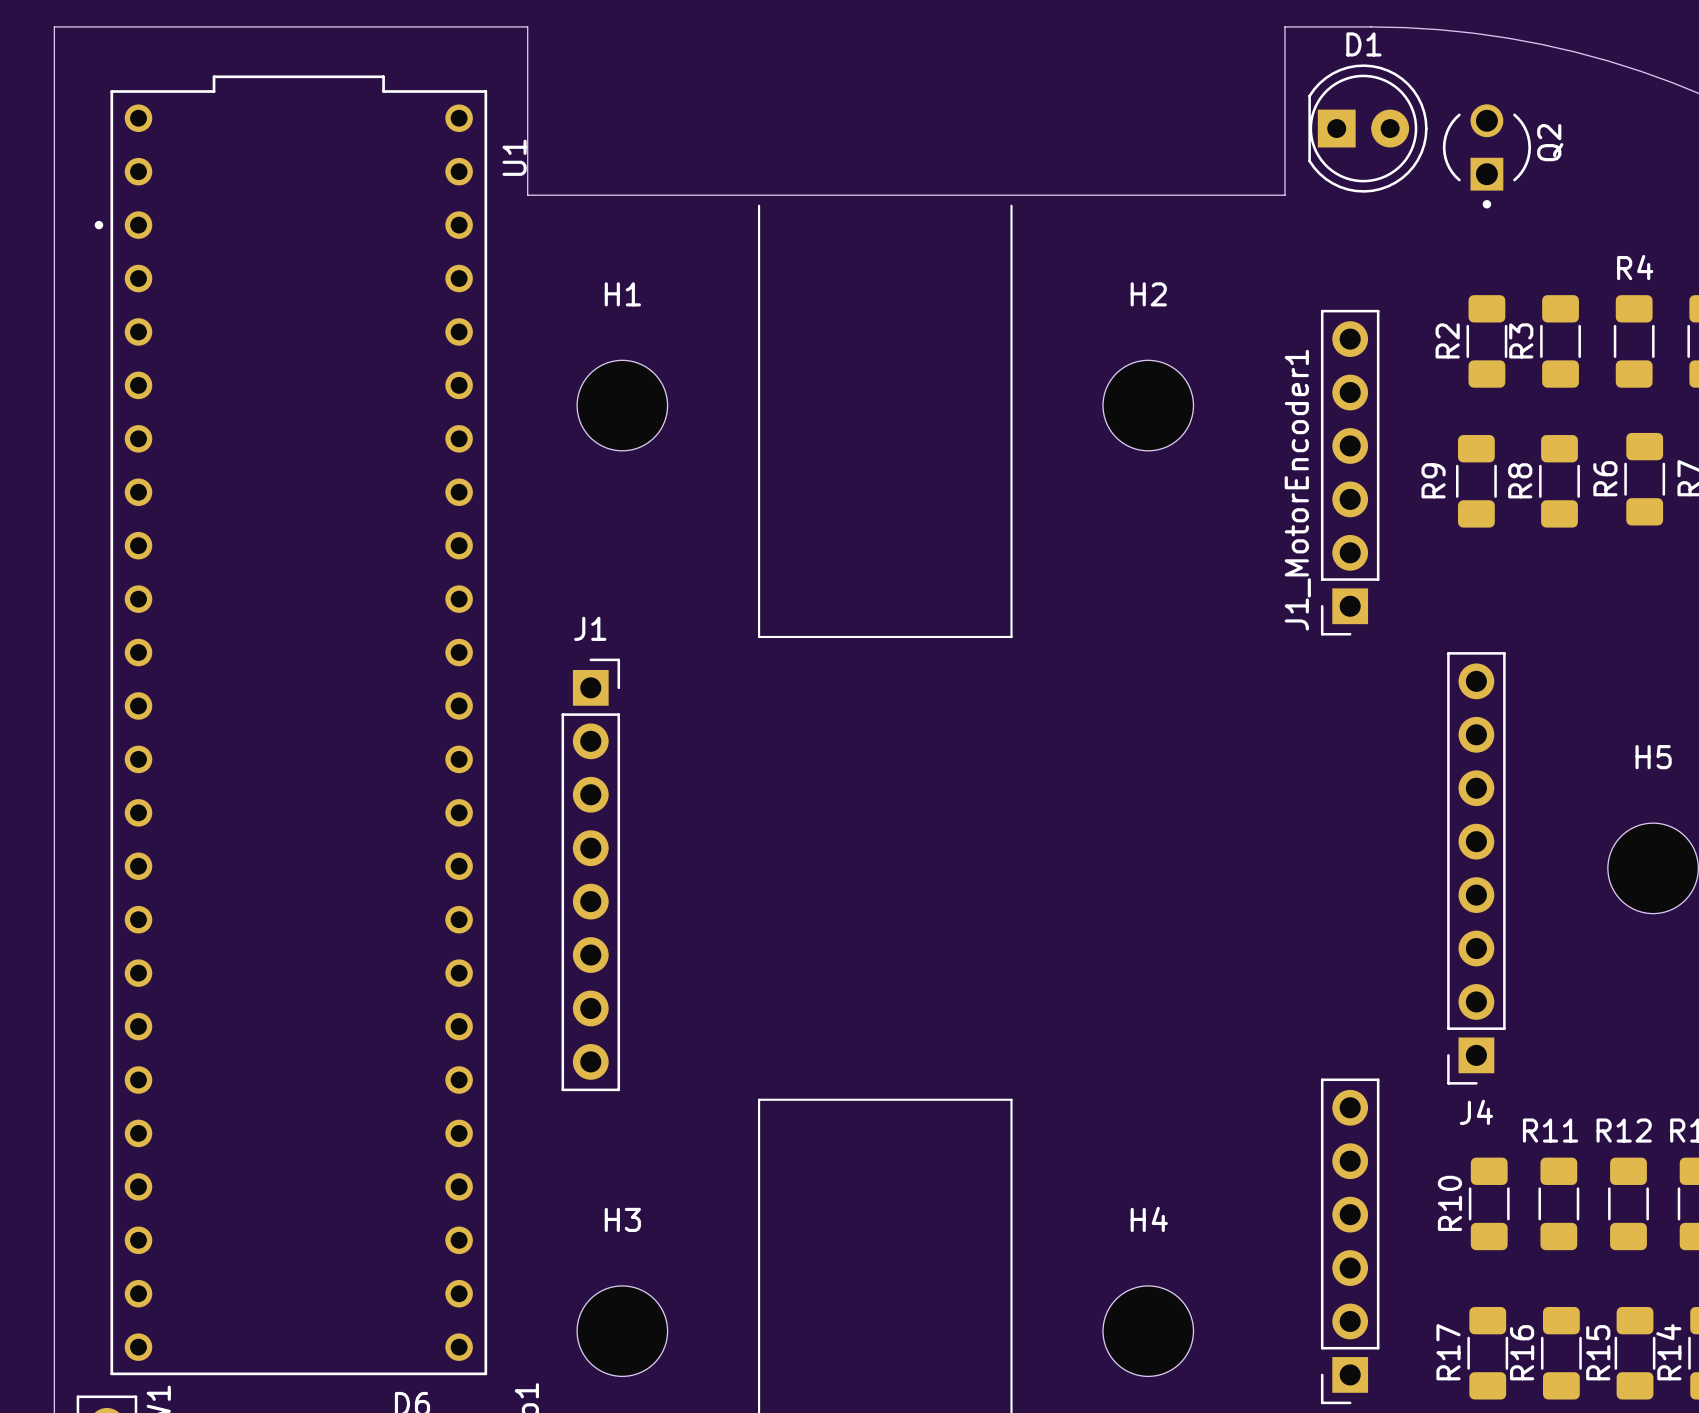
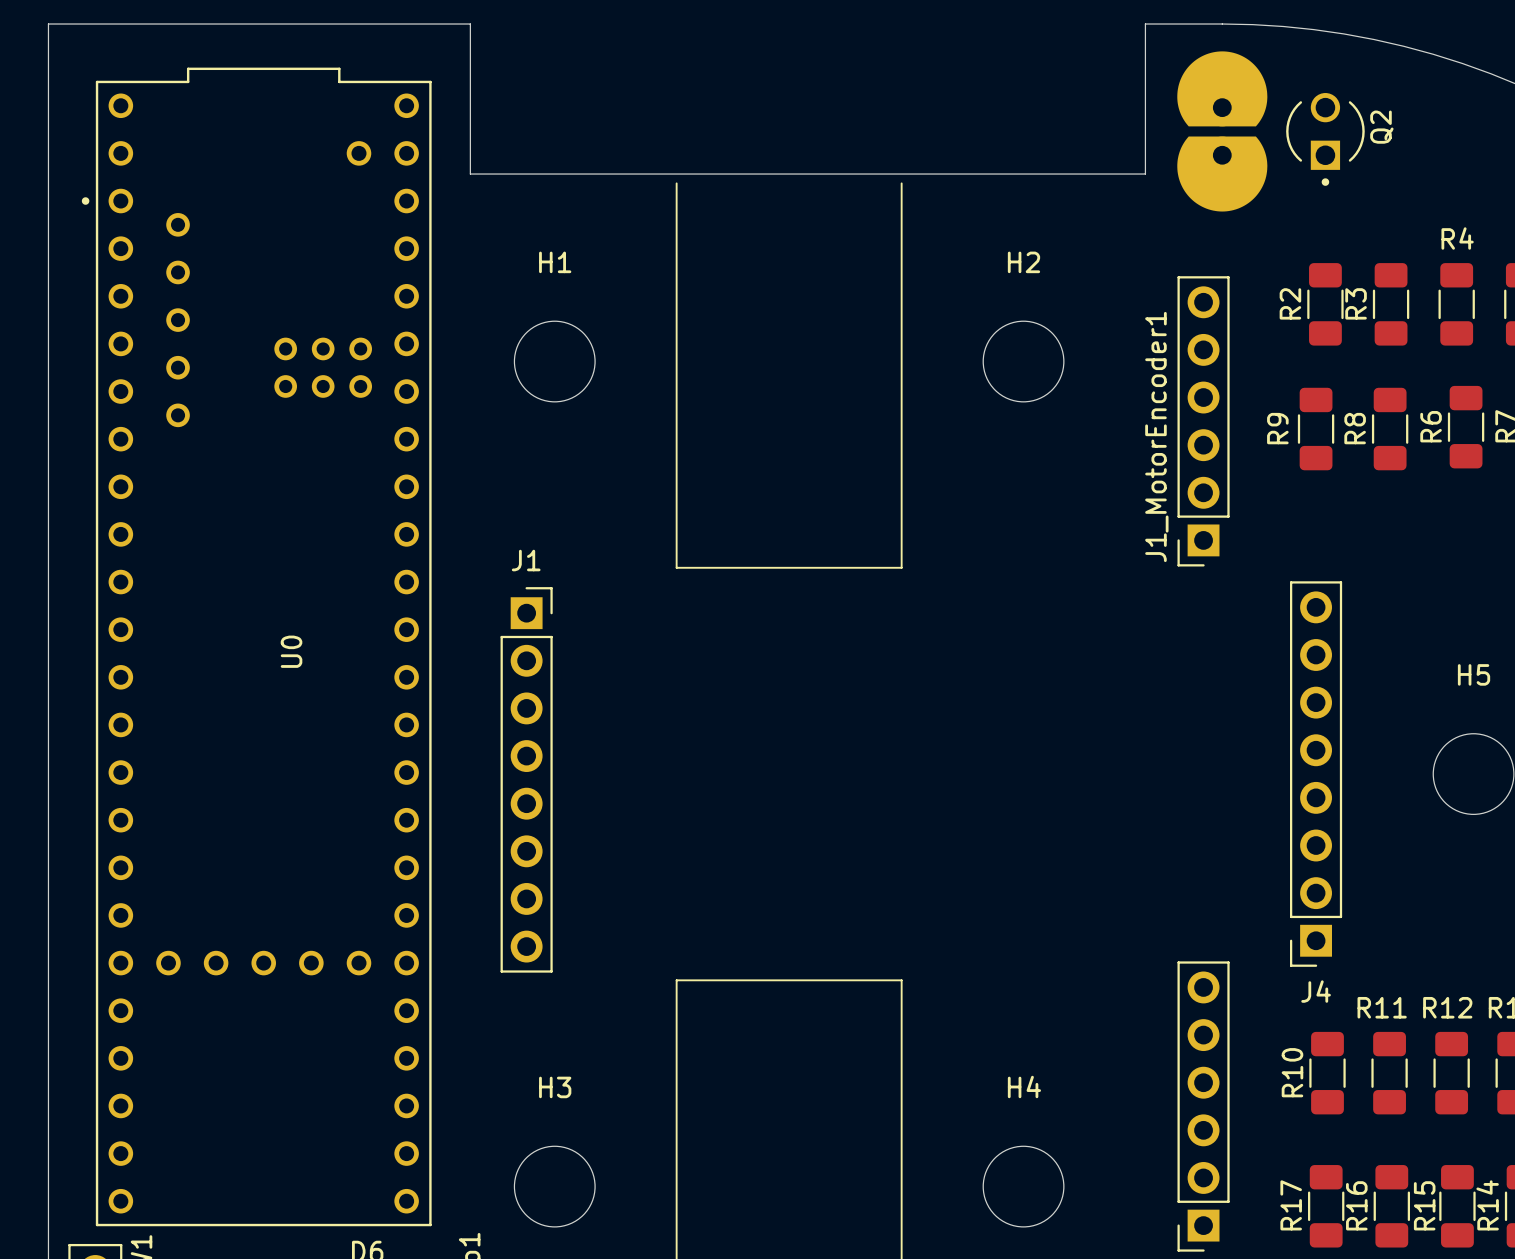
D1: (1367, 128) -> none
part: none -> (1222, 131)
U0: none -> (256, 646)
U1: (290, 725) -> none

